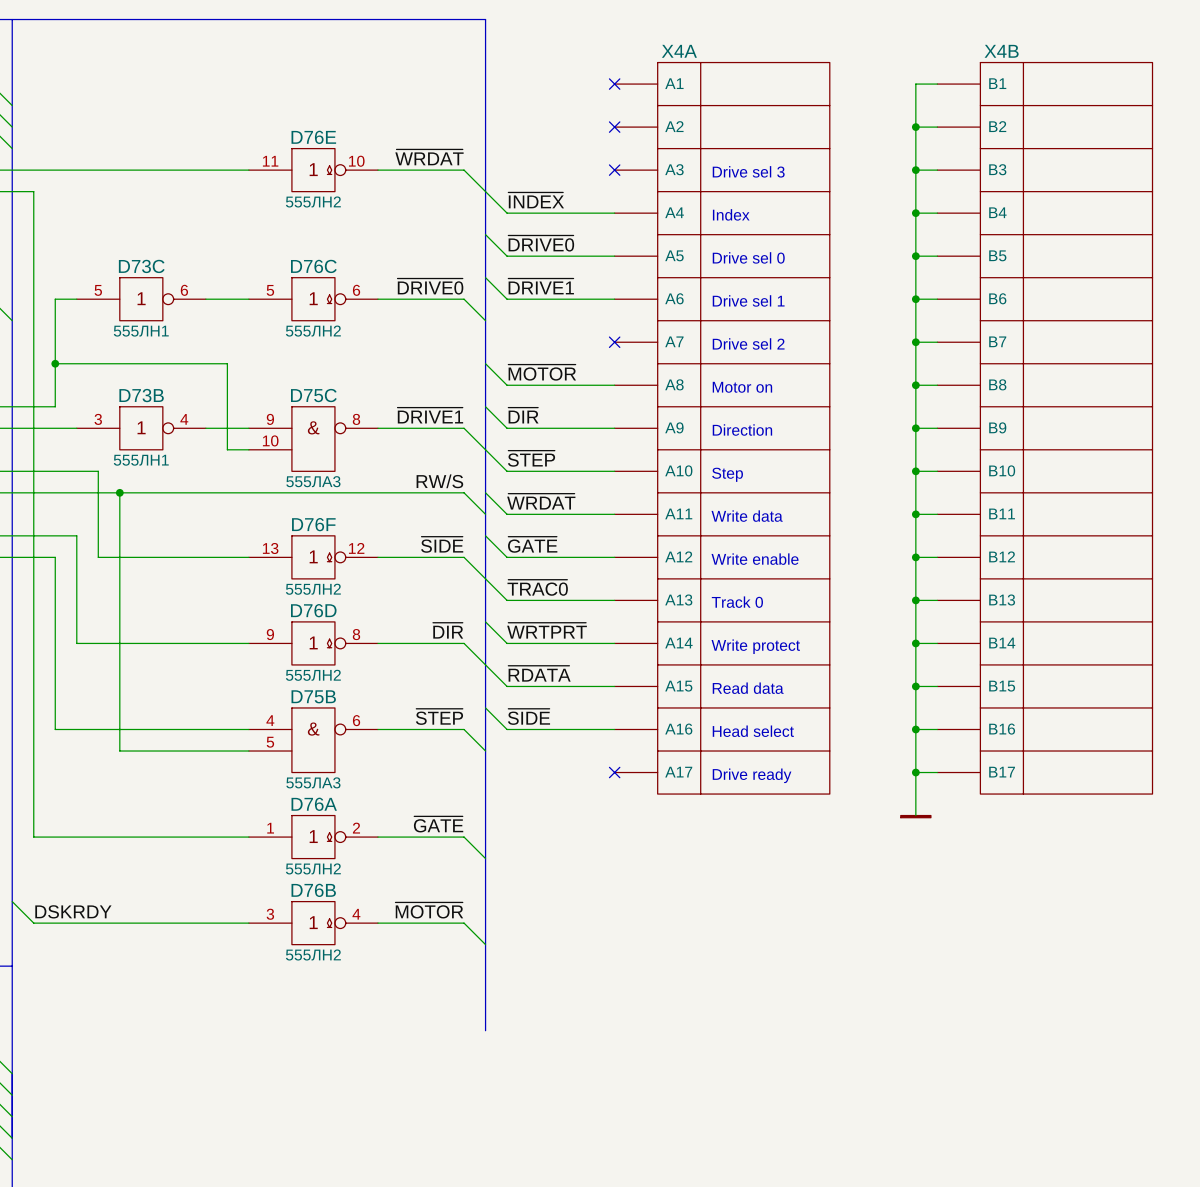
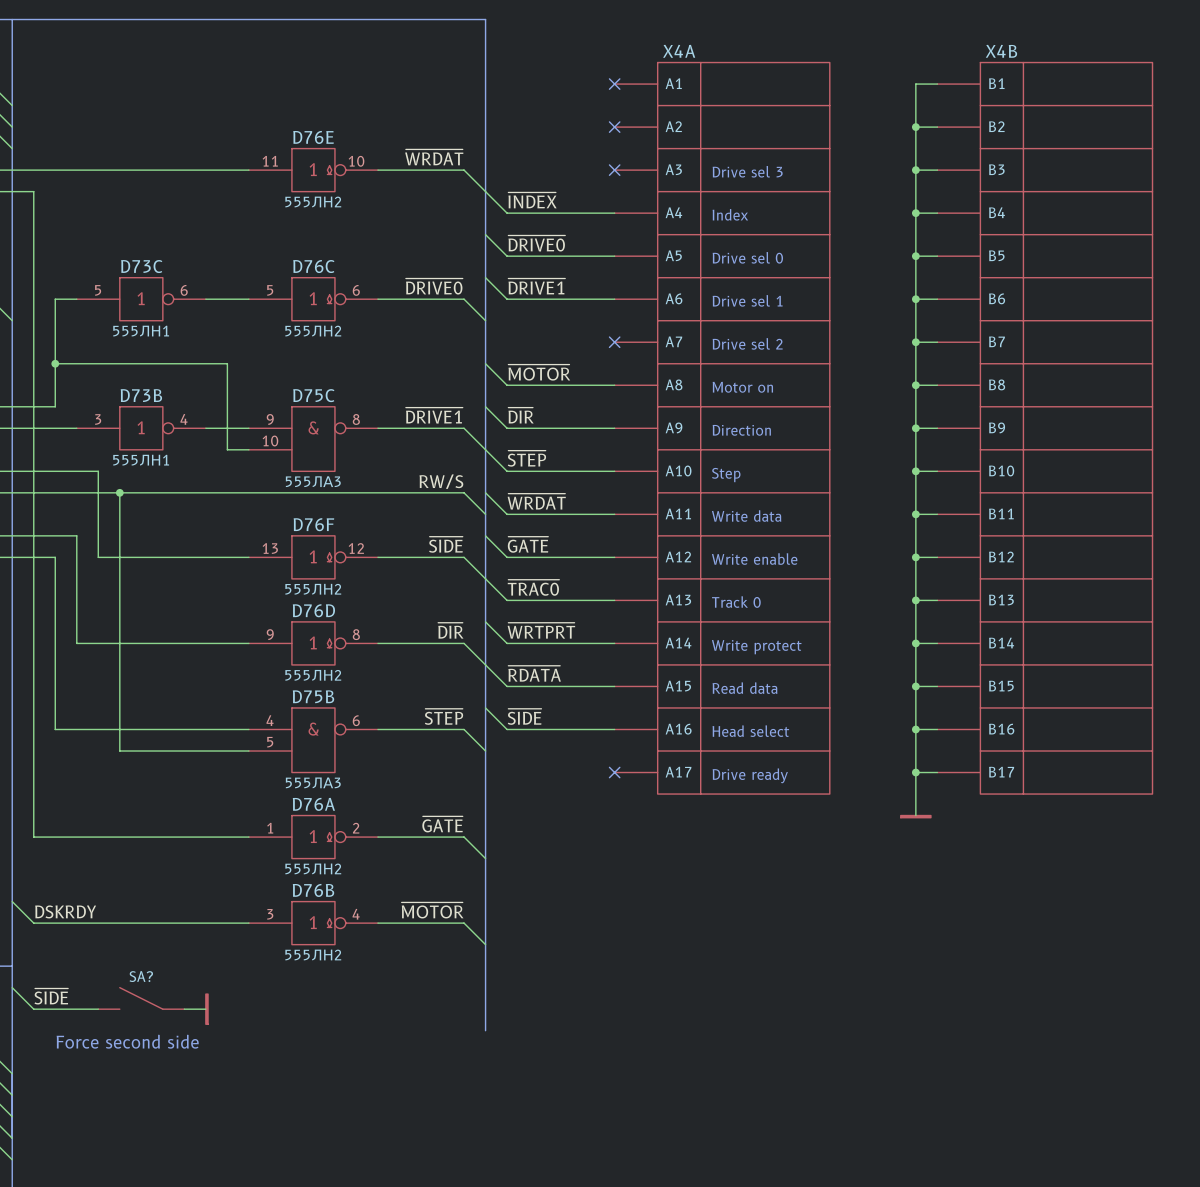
wire: none -> (12, 987) (33, 1009) (98, 1009)
label: none -> ~{SIDE} (51, 996)
SA?: none -> (141, 998)
wire: none -> (184, 1009) (205, 1009)
power symbol: none -> (206, 1009)
text: none -> Force second side (127, 1041)

